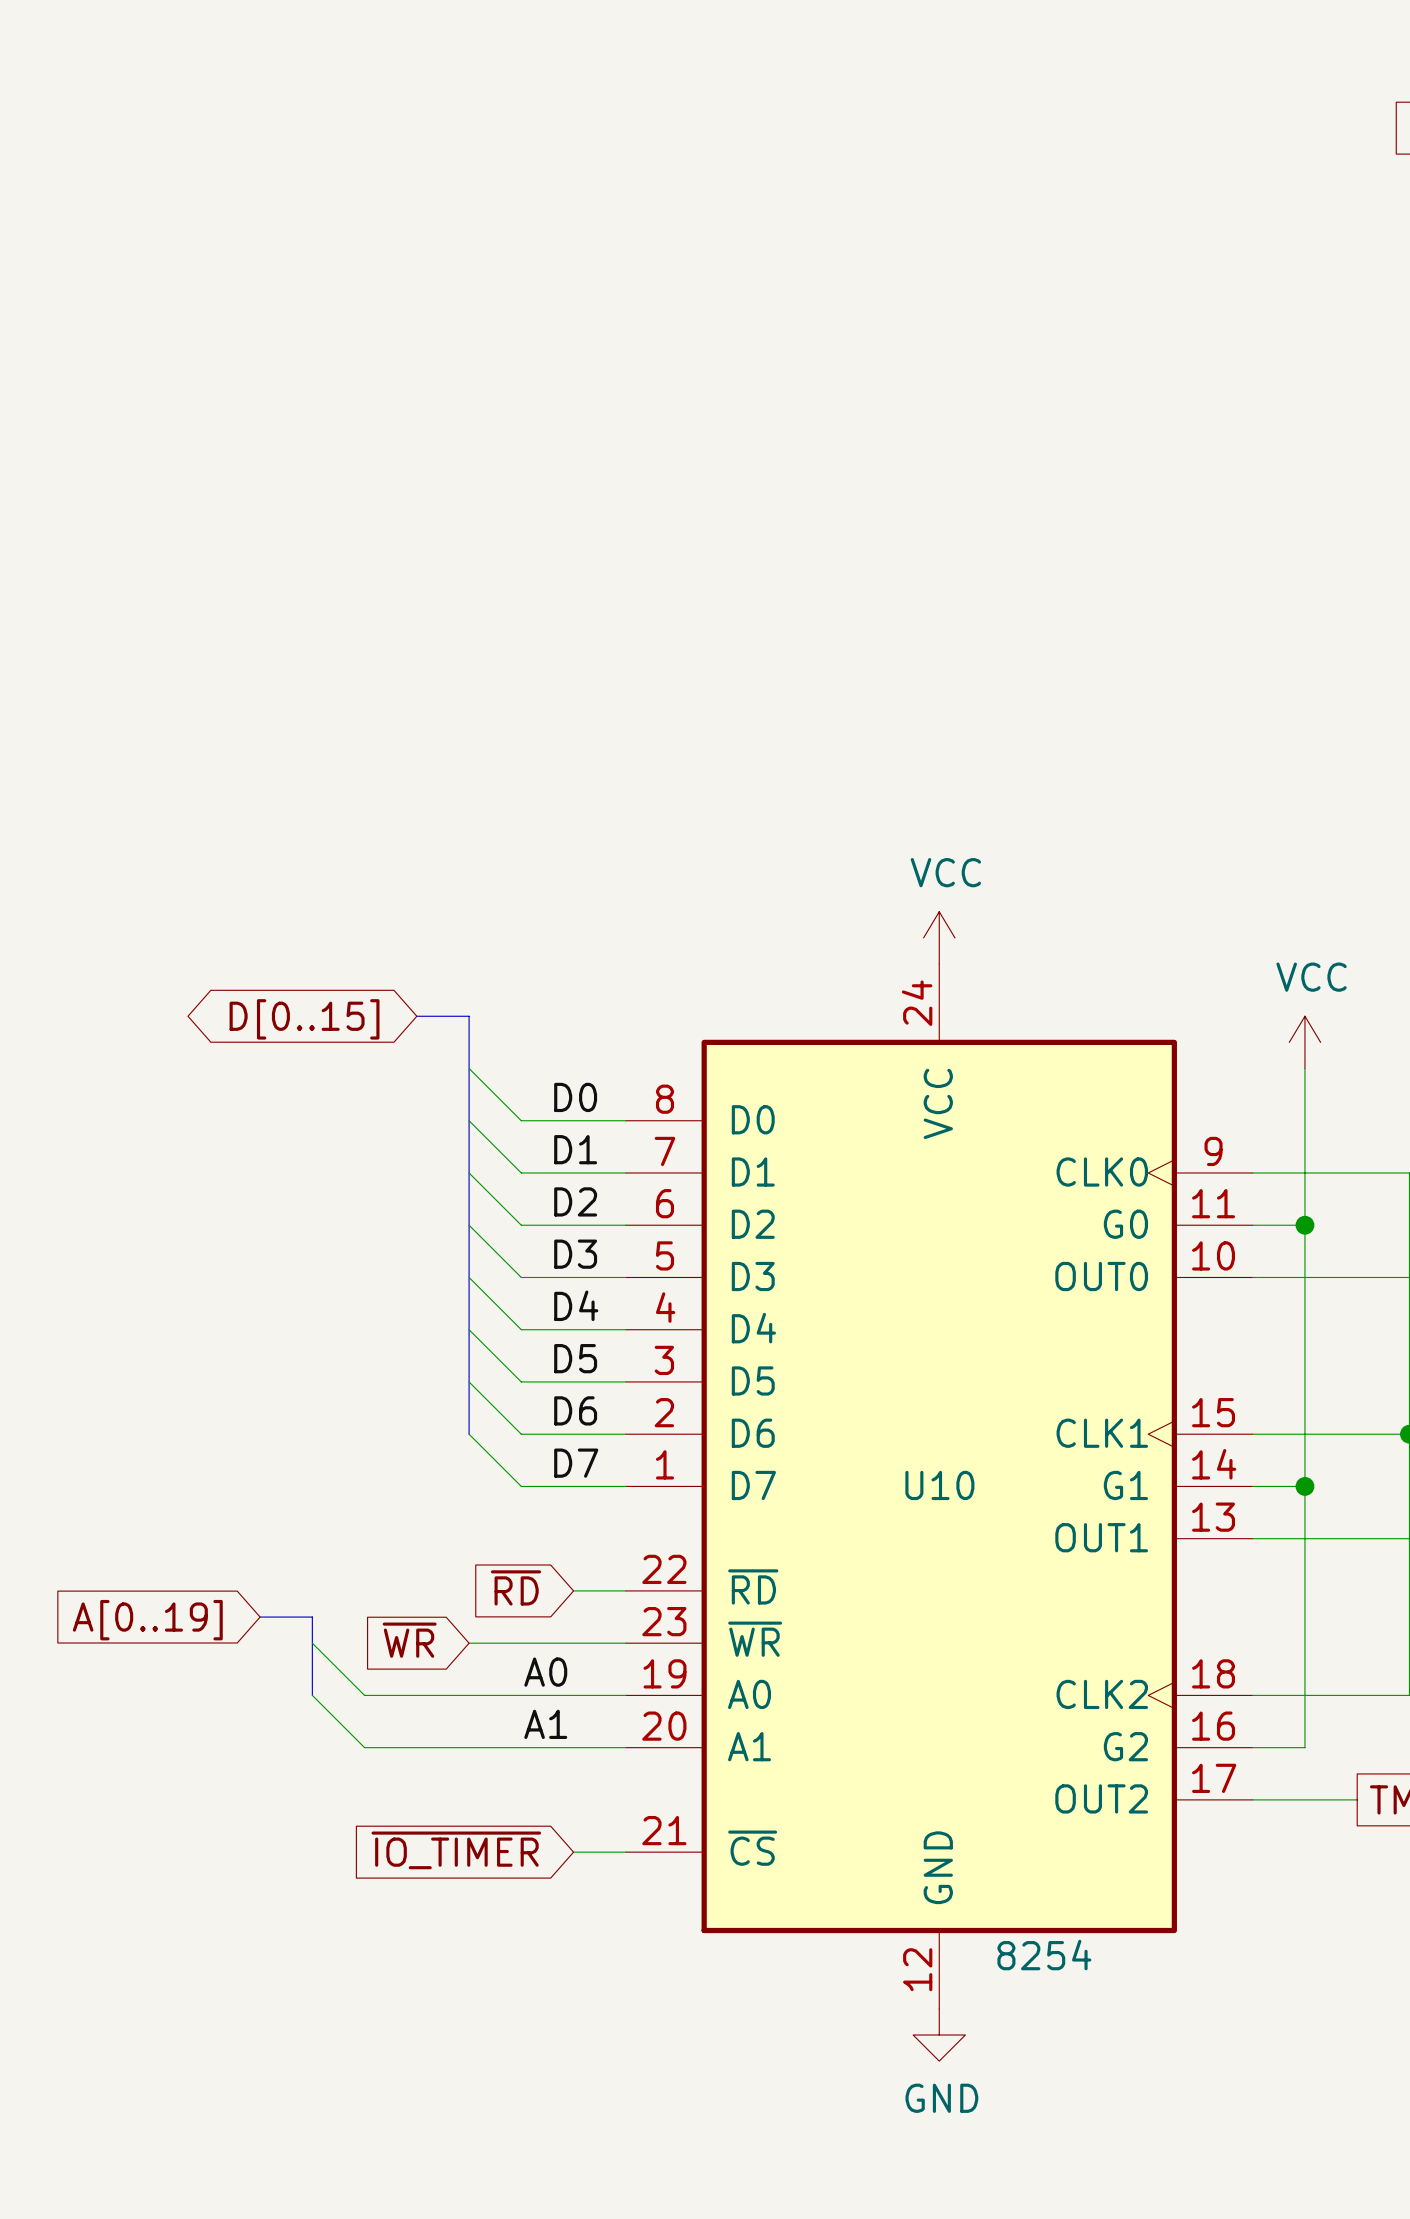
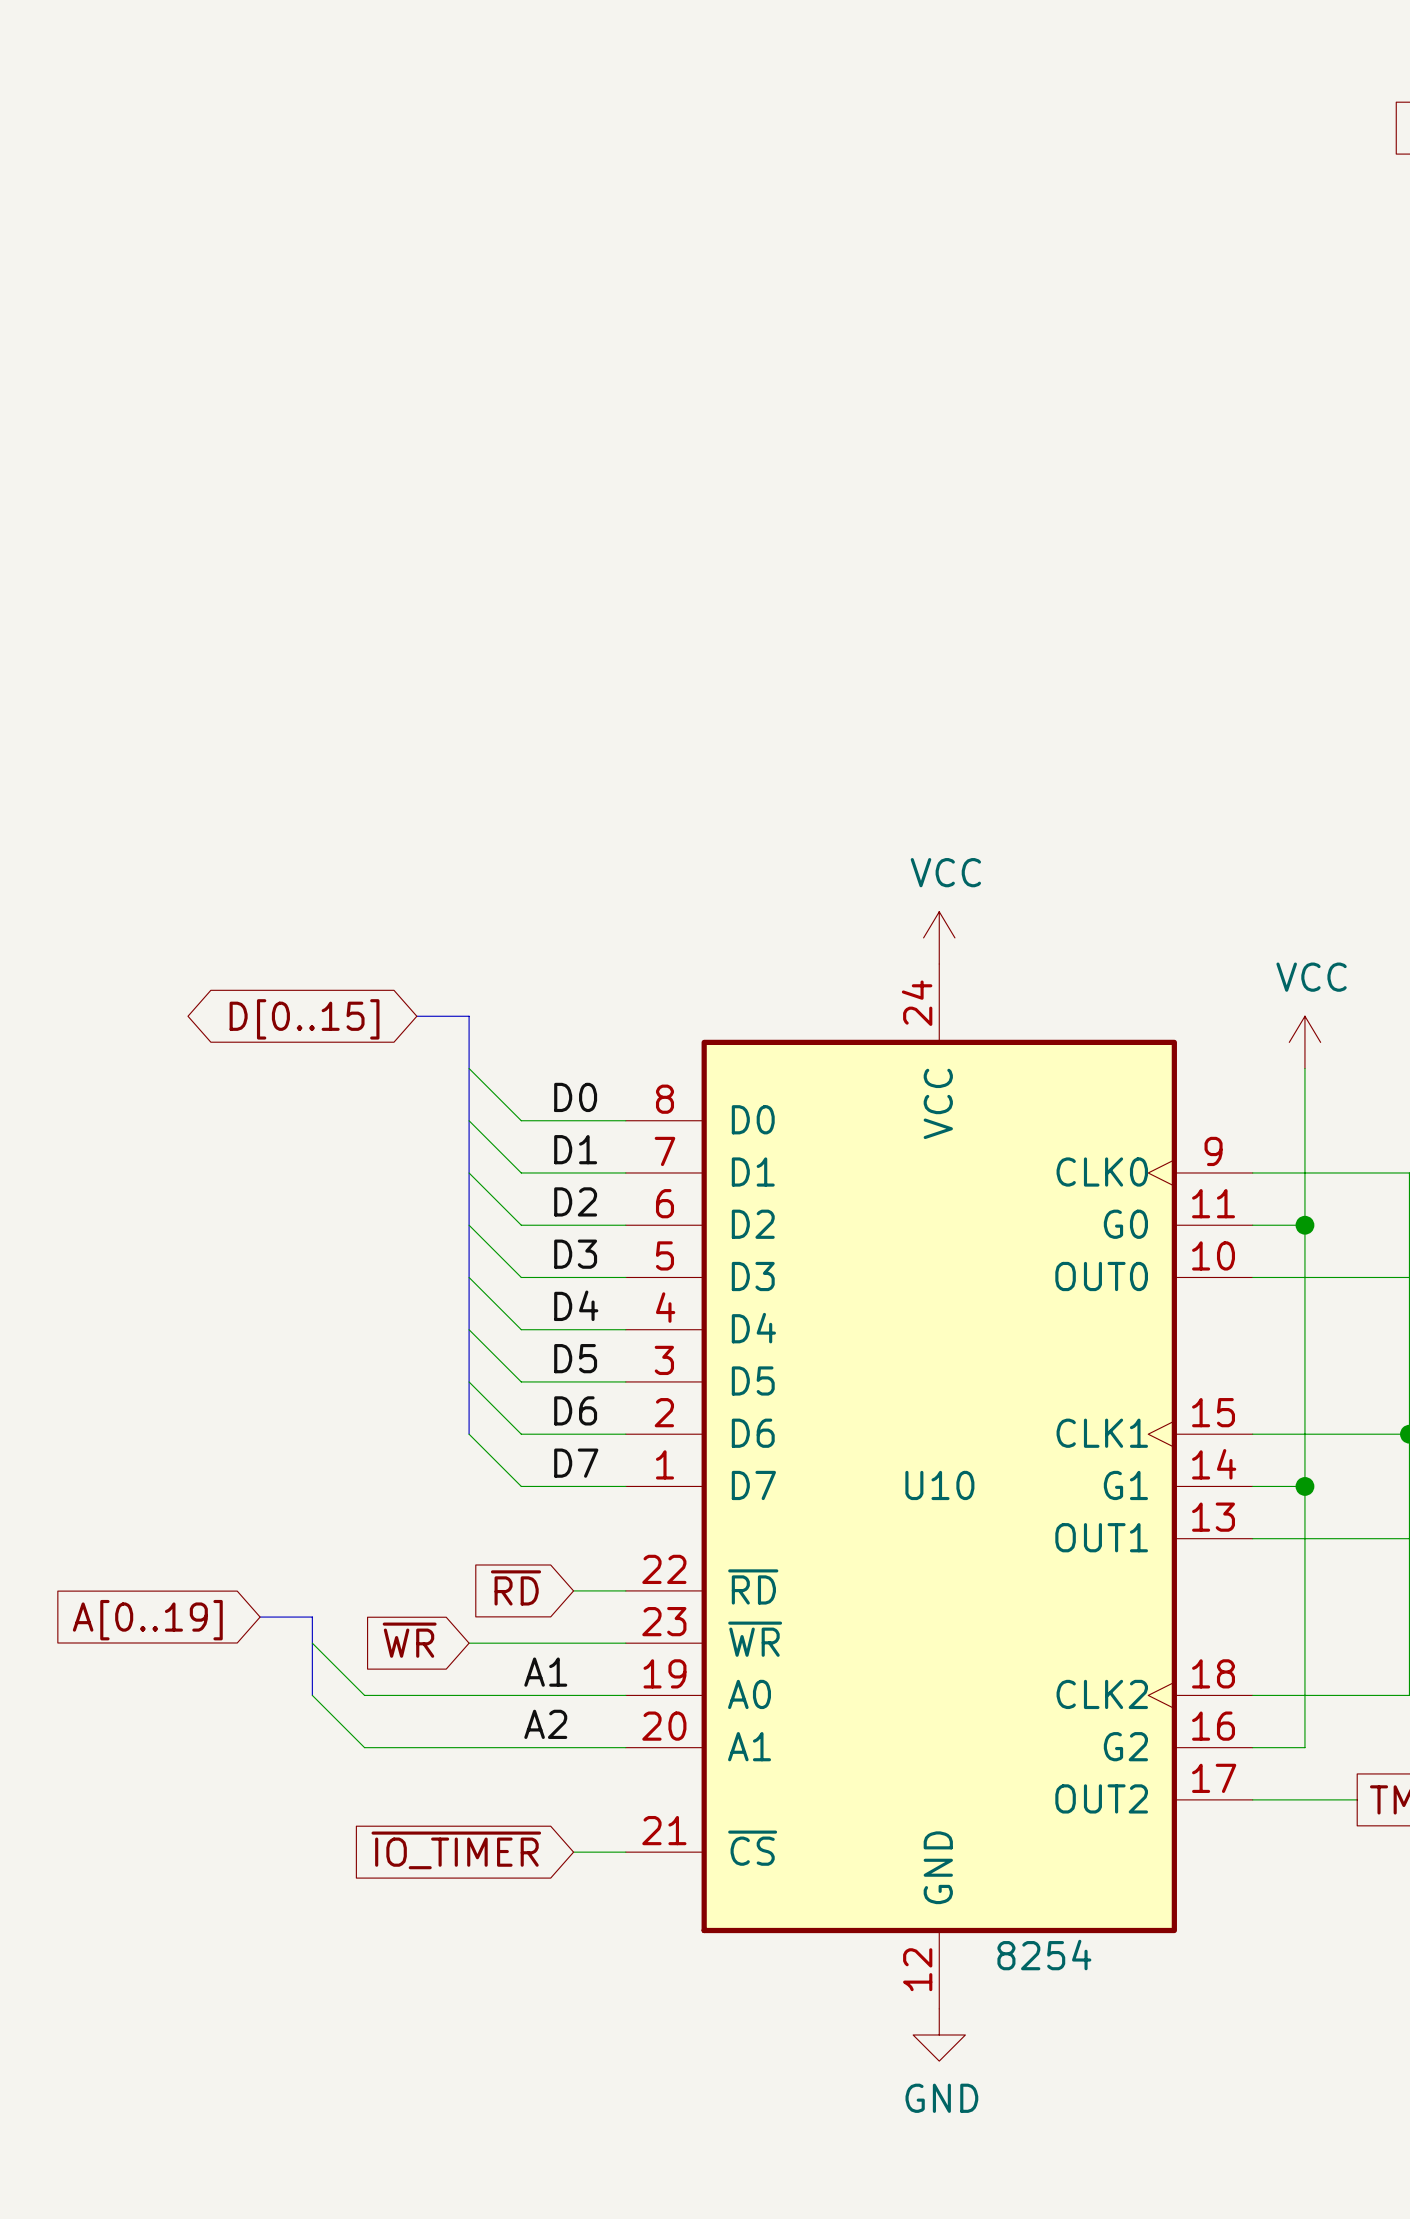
label: A0 (545, 1672) -> A1 (545, 1672)
label: A1 (545, 1724) -> A2 (545, 1724)

